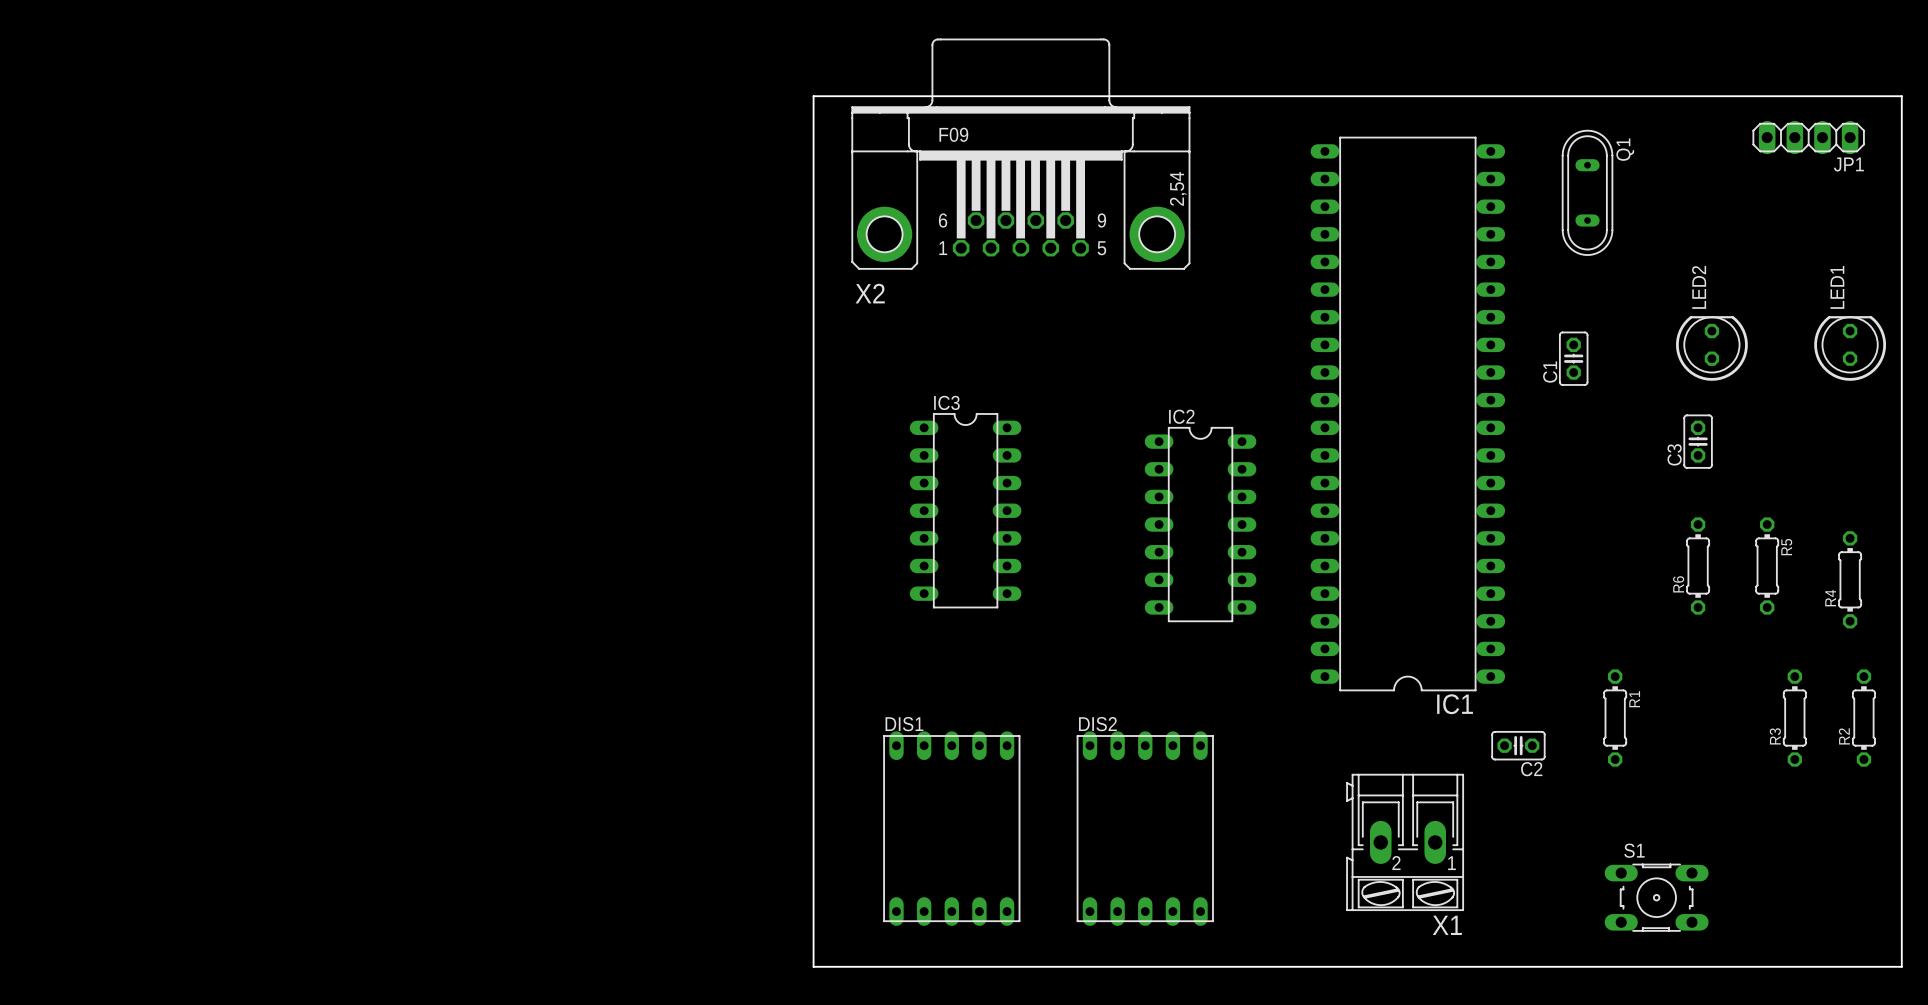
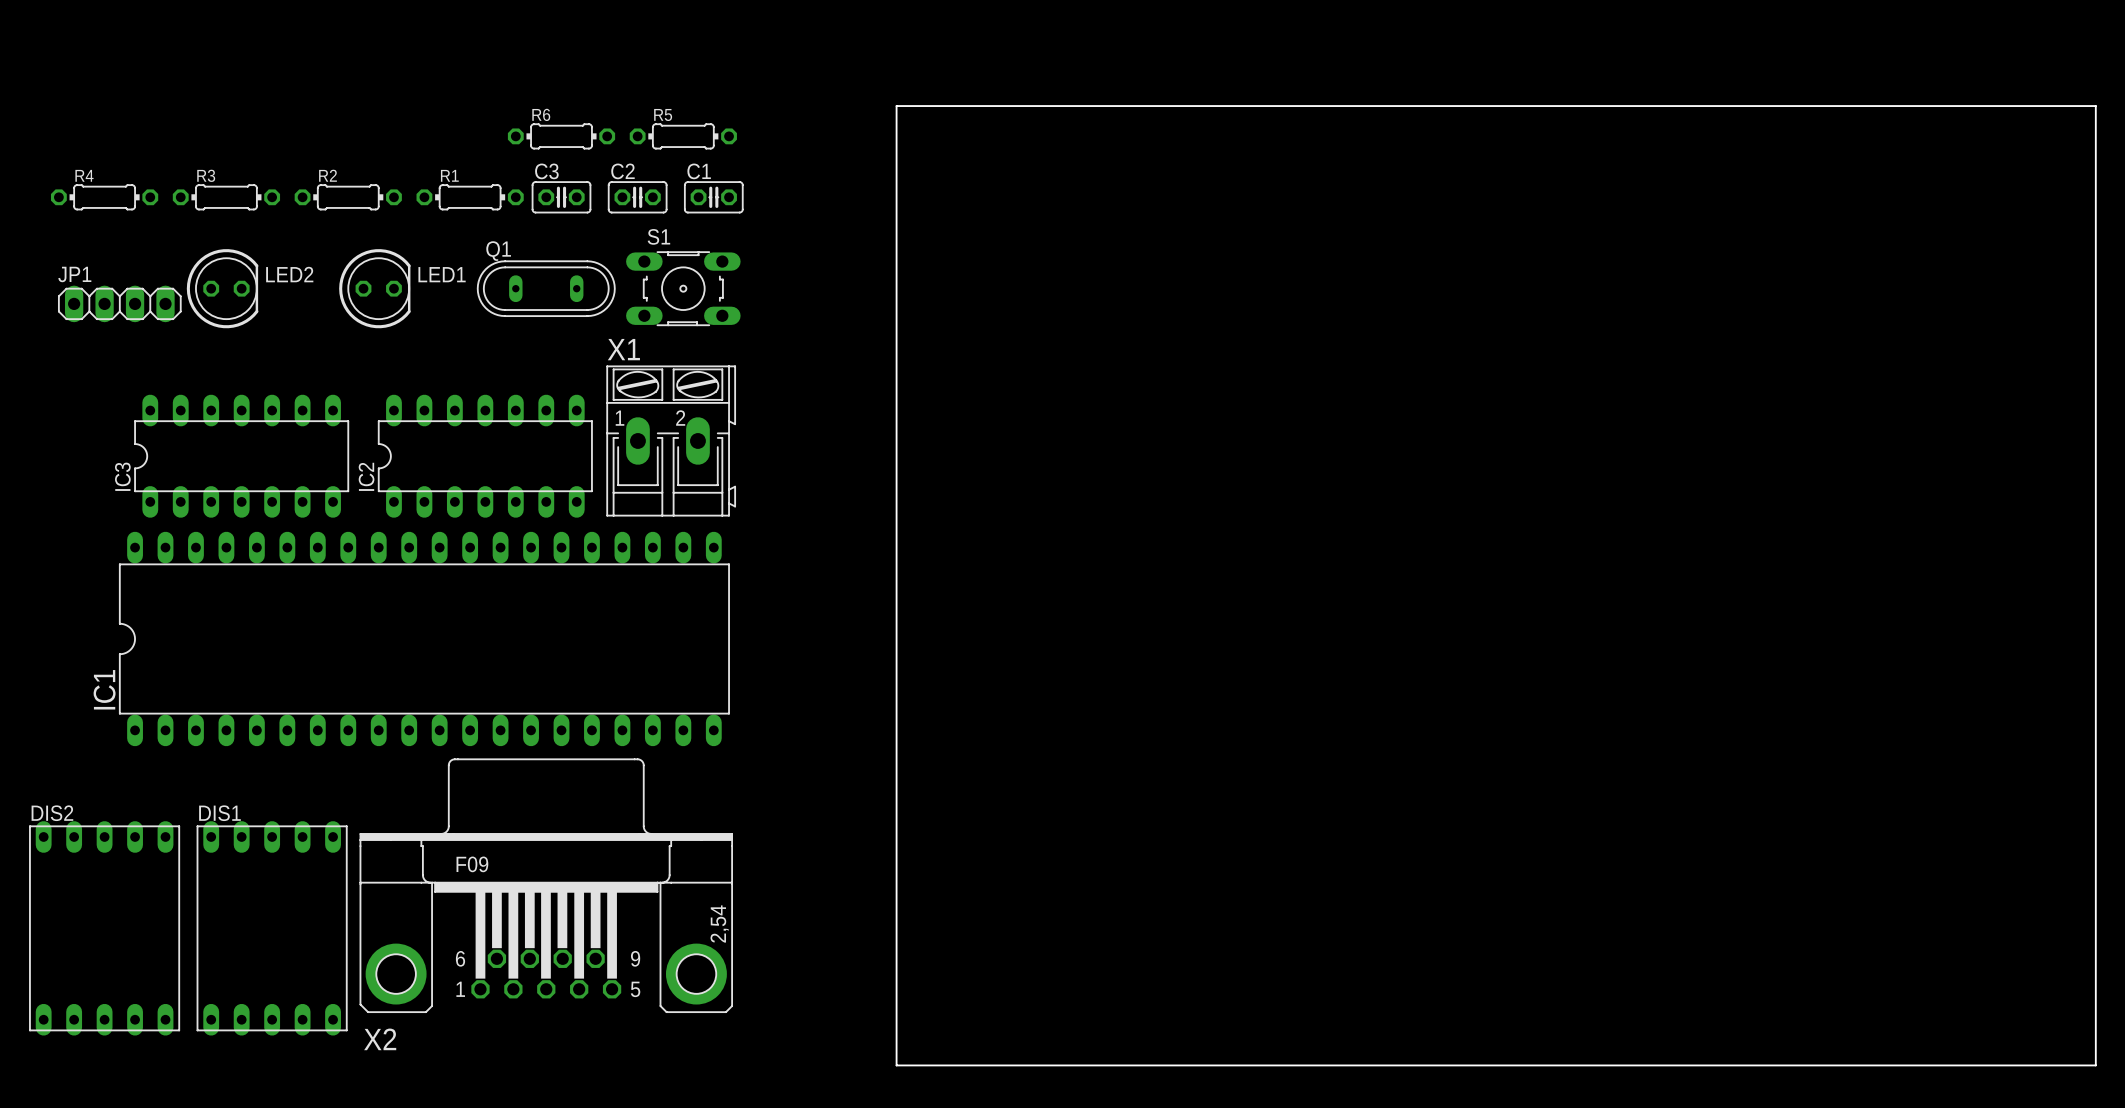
JP1 position: (1808, 137) -> (119, 303)
Q1 name position: Q1 (1625, 149) -> Q1 (498, 251)
X2 position: (1020, 154) -> (546, 885)
JP1 name position: JP1 (1848, 164) -> JP1 (74, 274)
Q1 rotation: 0° (1587, 192) -> 90° clockwise (546, 288)
Q1 position: (1587, 192) -> (546, 288)
LED2 rotation: 0° (1711, 348) -> 90° clockwise (222, 288)
LED2 position: (1711, 348) -> (222, 288)
LED1 rotation: 0° (1850, 348) -> 90° clockwise (374, 288)
LED1 position: (1850, 348) -> (374, 288)
C1 rotation: 0° (1573, 358) -> 90° clockwise (713, 197)
C1 position: (1573, 358) -> (713, 197)
IC1 rotation: 0° (1407, 413) -> 90° clockwise (424, 638)
IC1 position: (1407, 413) -> (424, 638)
C3 rotation: 0° (1698, 441) -> 90° clockwise (561, 197)
C3 position: (1698, 441) -> (561, 197)
IC3 rotation: 0° (965, 510) -> 90° counterclockwise (241, 456)
IC3 position: (965, 510) -> (241, 456)
IC2 rotation: 0° (1200, 524) -> 90° counterclockwise (485, 456)
IC2 position: (1200, 524) -> (485, 456)
R5 name position: R5 (1786, 547) -> R5 (663, 114)
R6 rotation: 0° (1698, 566) -> 90° clockwise (561, 136)
R6 position: (1698, 566) -> (561, 136)
R5 rotation: 0° (1767, 566) -> 90° clockwise (683, 136)
R5 position: (1767, 566) -> (683, 136)
R4 rotation: 0° (1850, 579) -> 90° clockwise (104, 197)
R4 position: (1850, 579) -> (104, 197)
R1 name position: R1 (1634, 699) -> R1 (449, 175)
R1 rotation: 0° (1615, 718) -> 90° clockwise (470, 197)
R1 position: (1615, 718) -> (470, 197)
R3 rotation: 0° (1794, 718) -> 90° clockwise (226, 197)
R3 position: (1794, 718) -> (226, 197)
R2 rotation: 0° (1863, 718) -> 90° clockwise (348, 197)
R2 position: (1863, 718) -> (348, 197)
C2 position: (1518, 745) -> (637, 197)
C2 name position: C2 (1531, 769) -> C2 (622, 171)
X1 footprint: [1346, 773, 1464, 911] -> [606, 365, 737, 517]
DIS1 position: (951, 828) -> (272, 928)
DIS2 position: (1145, 828) -> (104, 928)
S1 position: (1656, 897) -> (683, 288)
X1 name position: X1 (1447, 925) -> X1 (623, 349)

